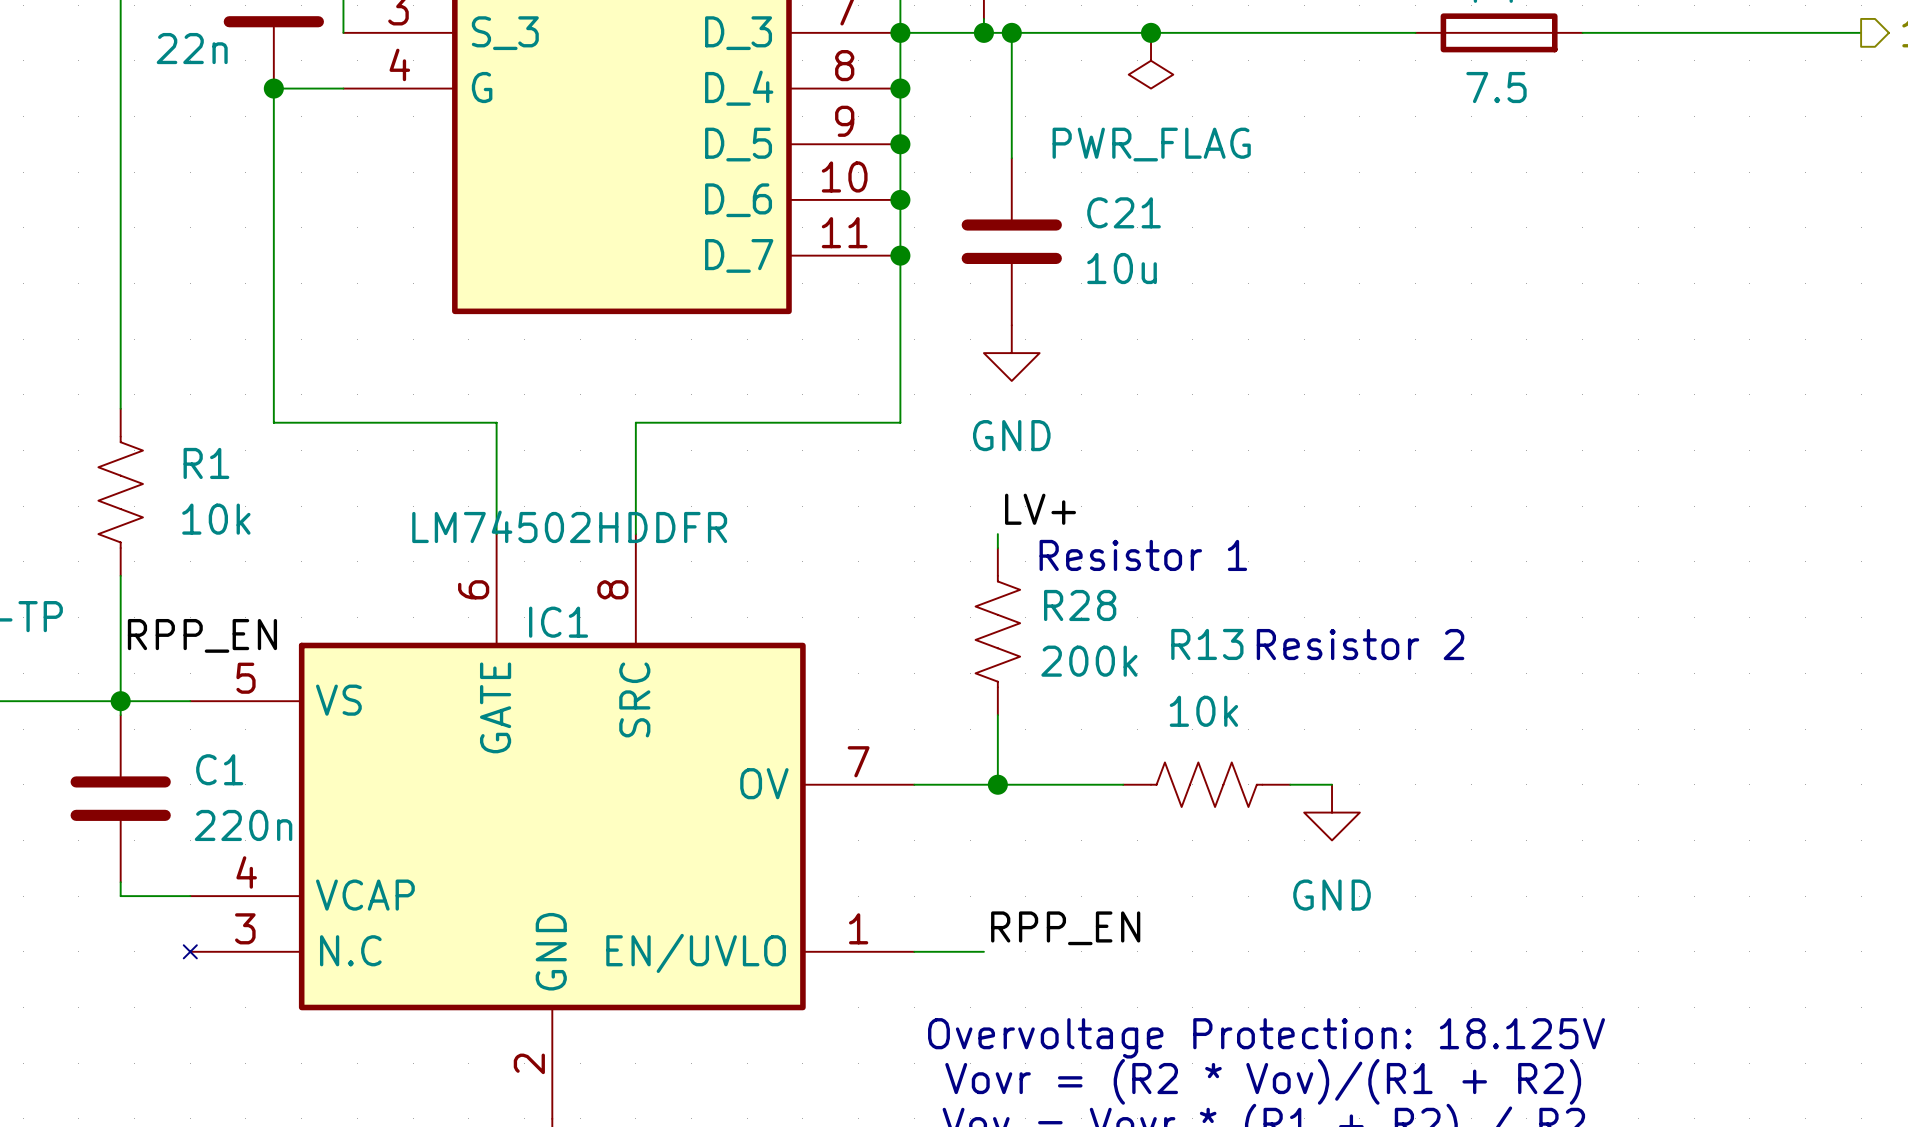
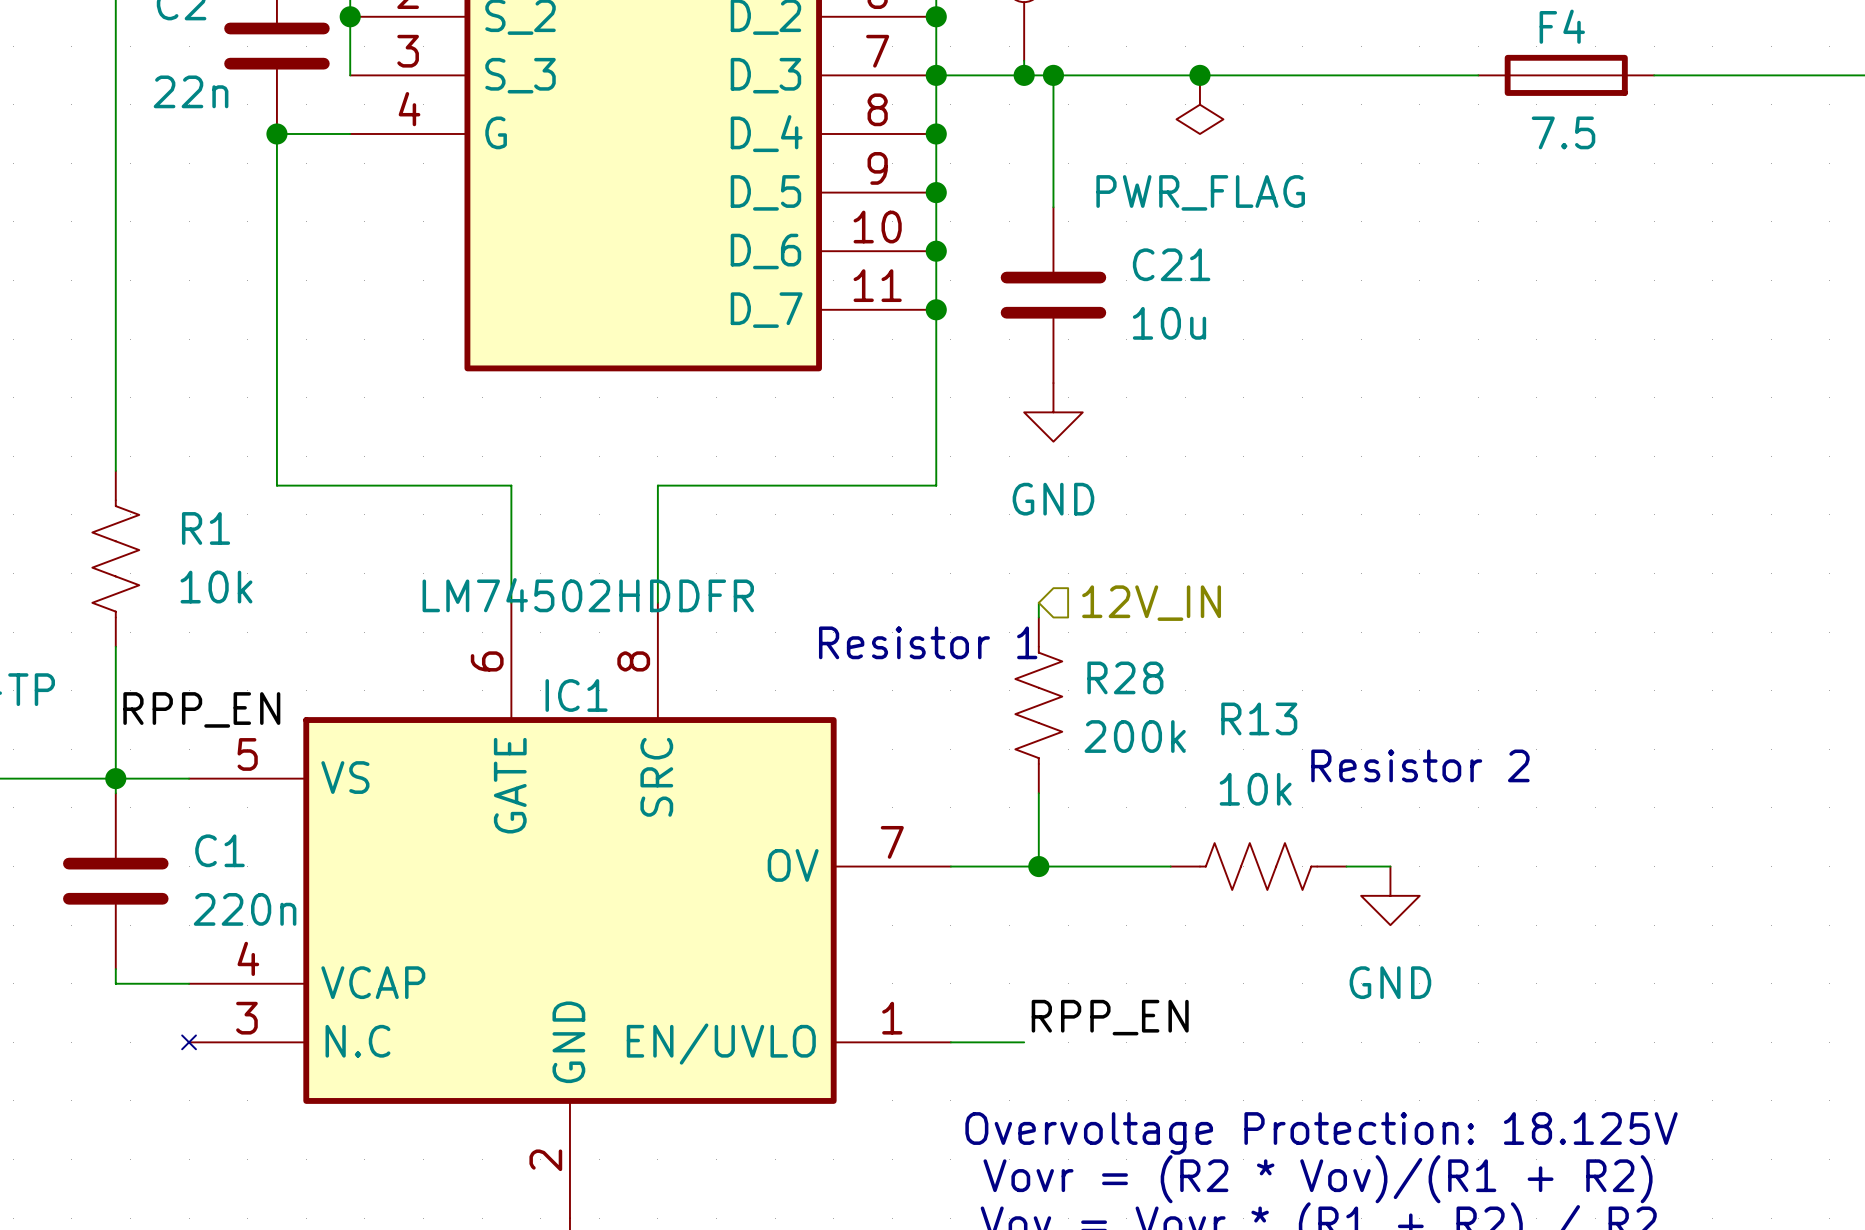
label: LV+ (1040, 509) -> none
hierarchical label: none -> 12V_IN (1151, 603)
text position: Resistor 1 (1143, 555) -> Resistor 1 (928, 642)
text position: Resistor 2 (1360, 644) -> Resistor 2 (1420, 765)

